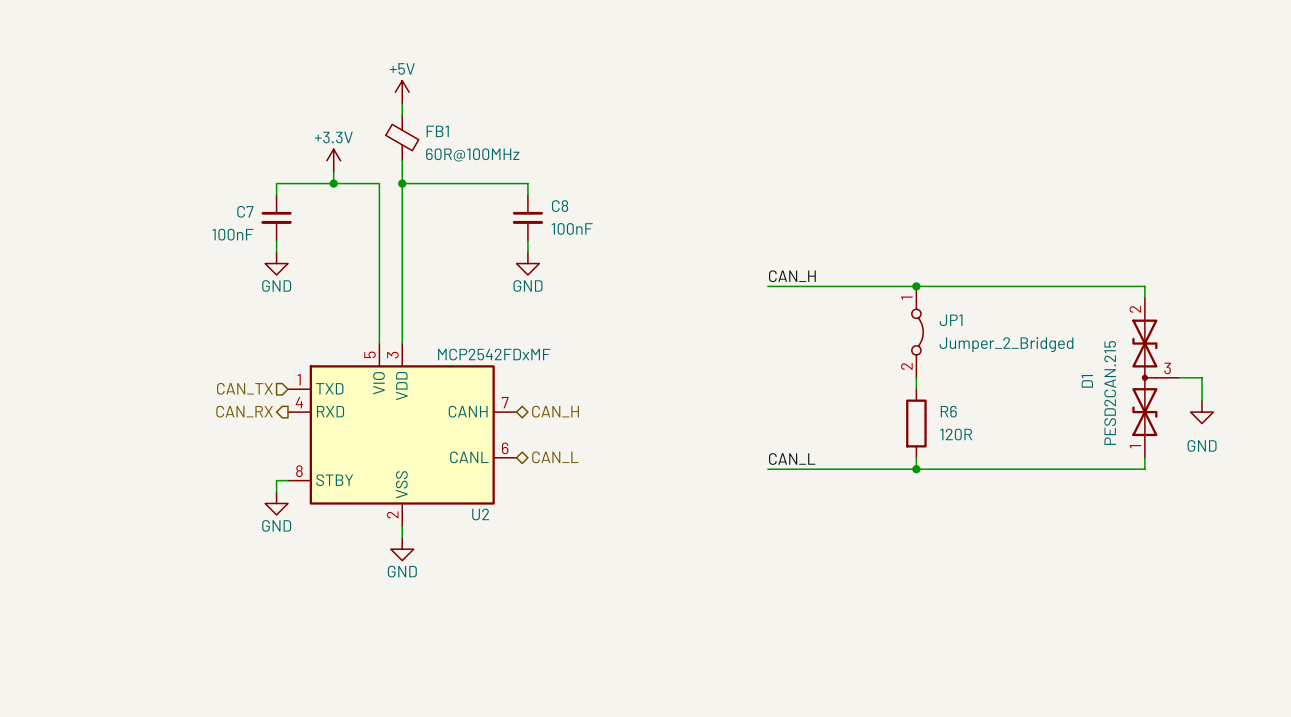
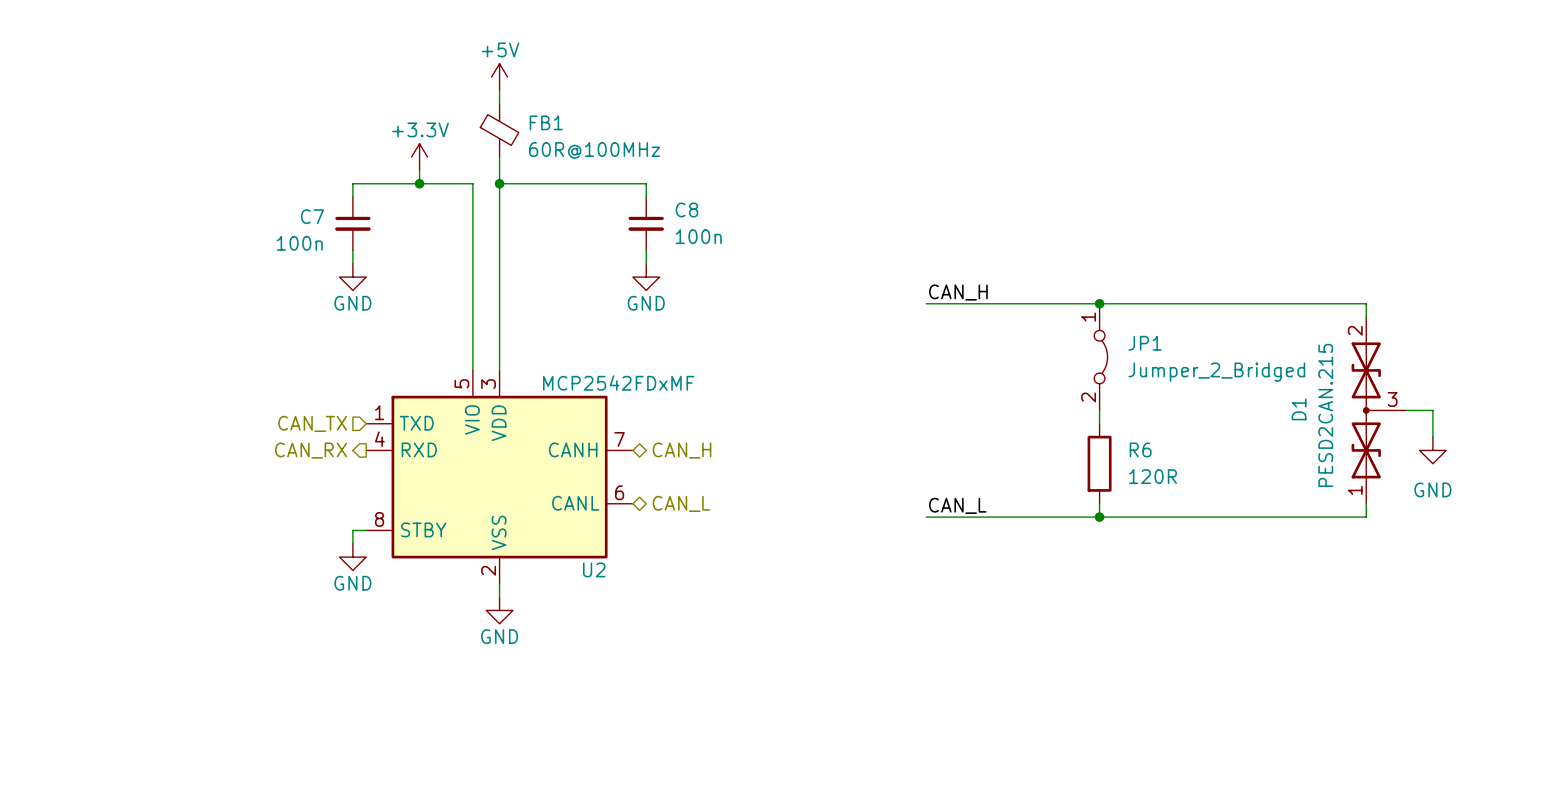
C8 value: 100nF (572, 228) -> 100n (698, 236)
C7 value: 100nF (232, 234) -> 100n (299, 243)

